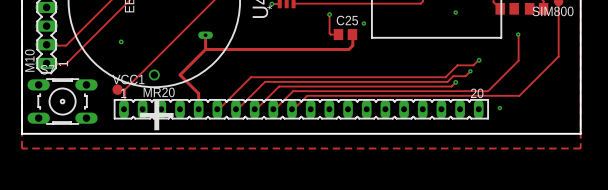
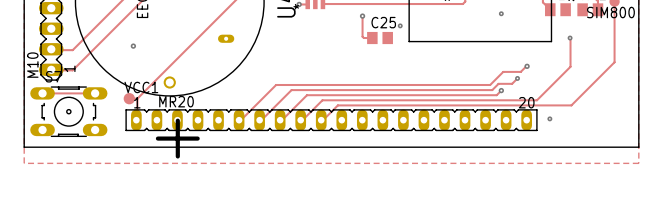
track: (352, 34) (352, 45) (348, 49) (205, 49) -> none
track: (205, 35) (205, 49) -> none
track: (205, 49) (180, 74) (198, 93) (198, 109) -> none
track: none -> (42, 93) (95, 93)

